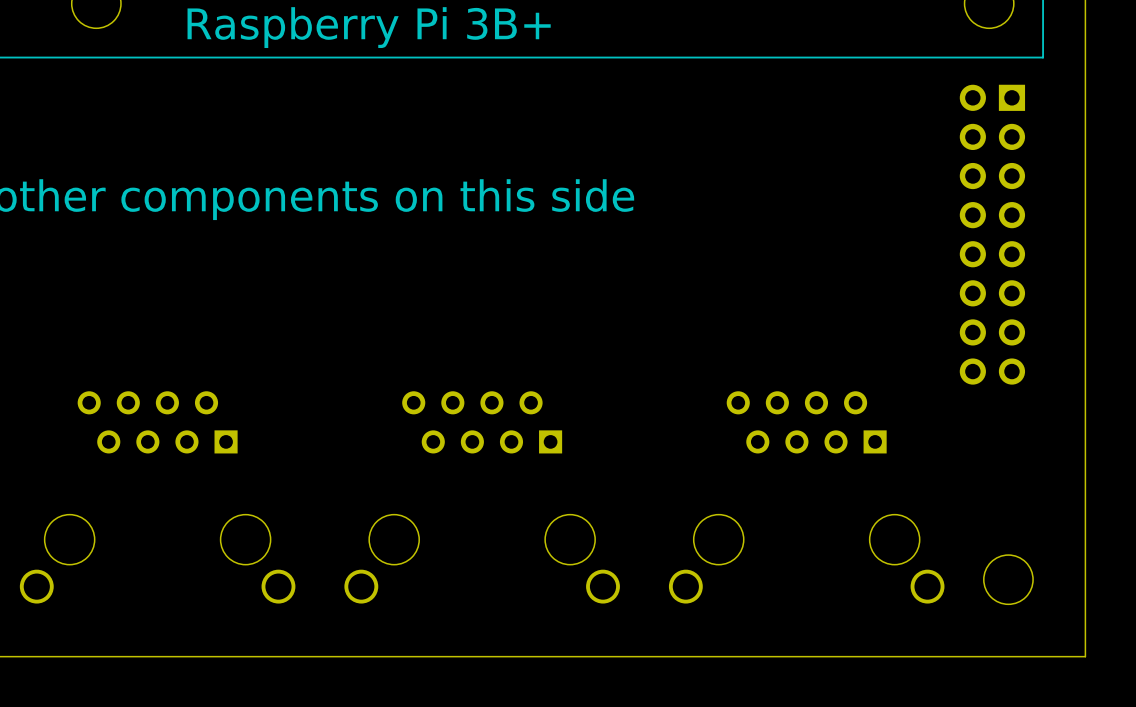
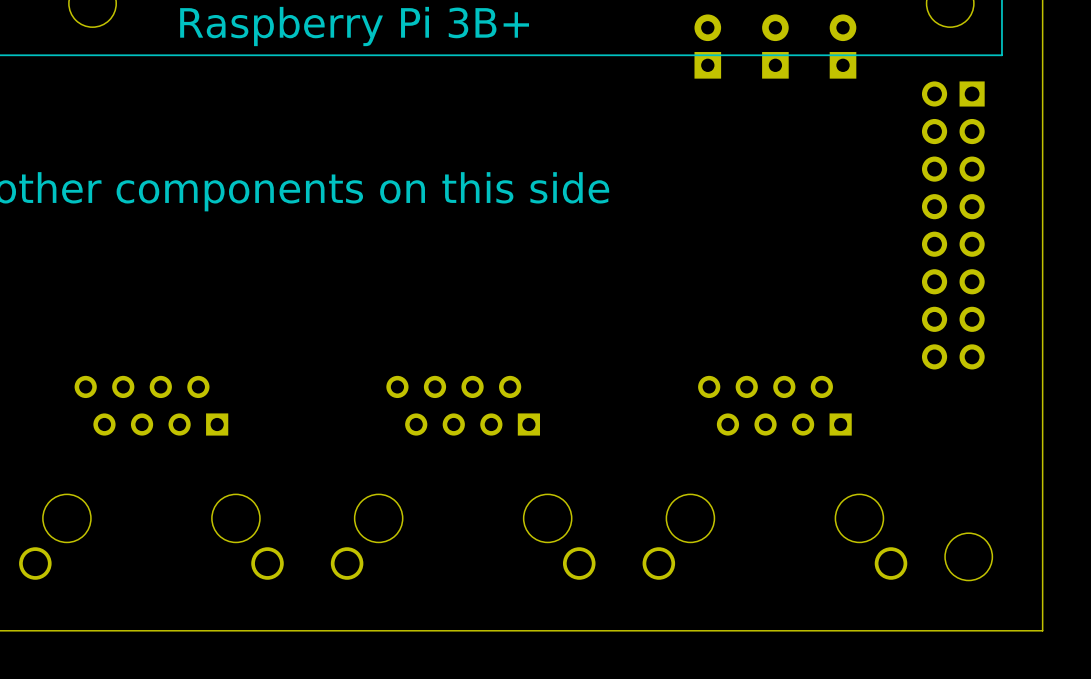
part: none -> (707, 46)
part: none -> (775, 46)
part: none -> (843, 46)

